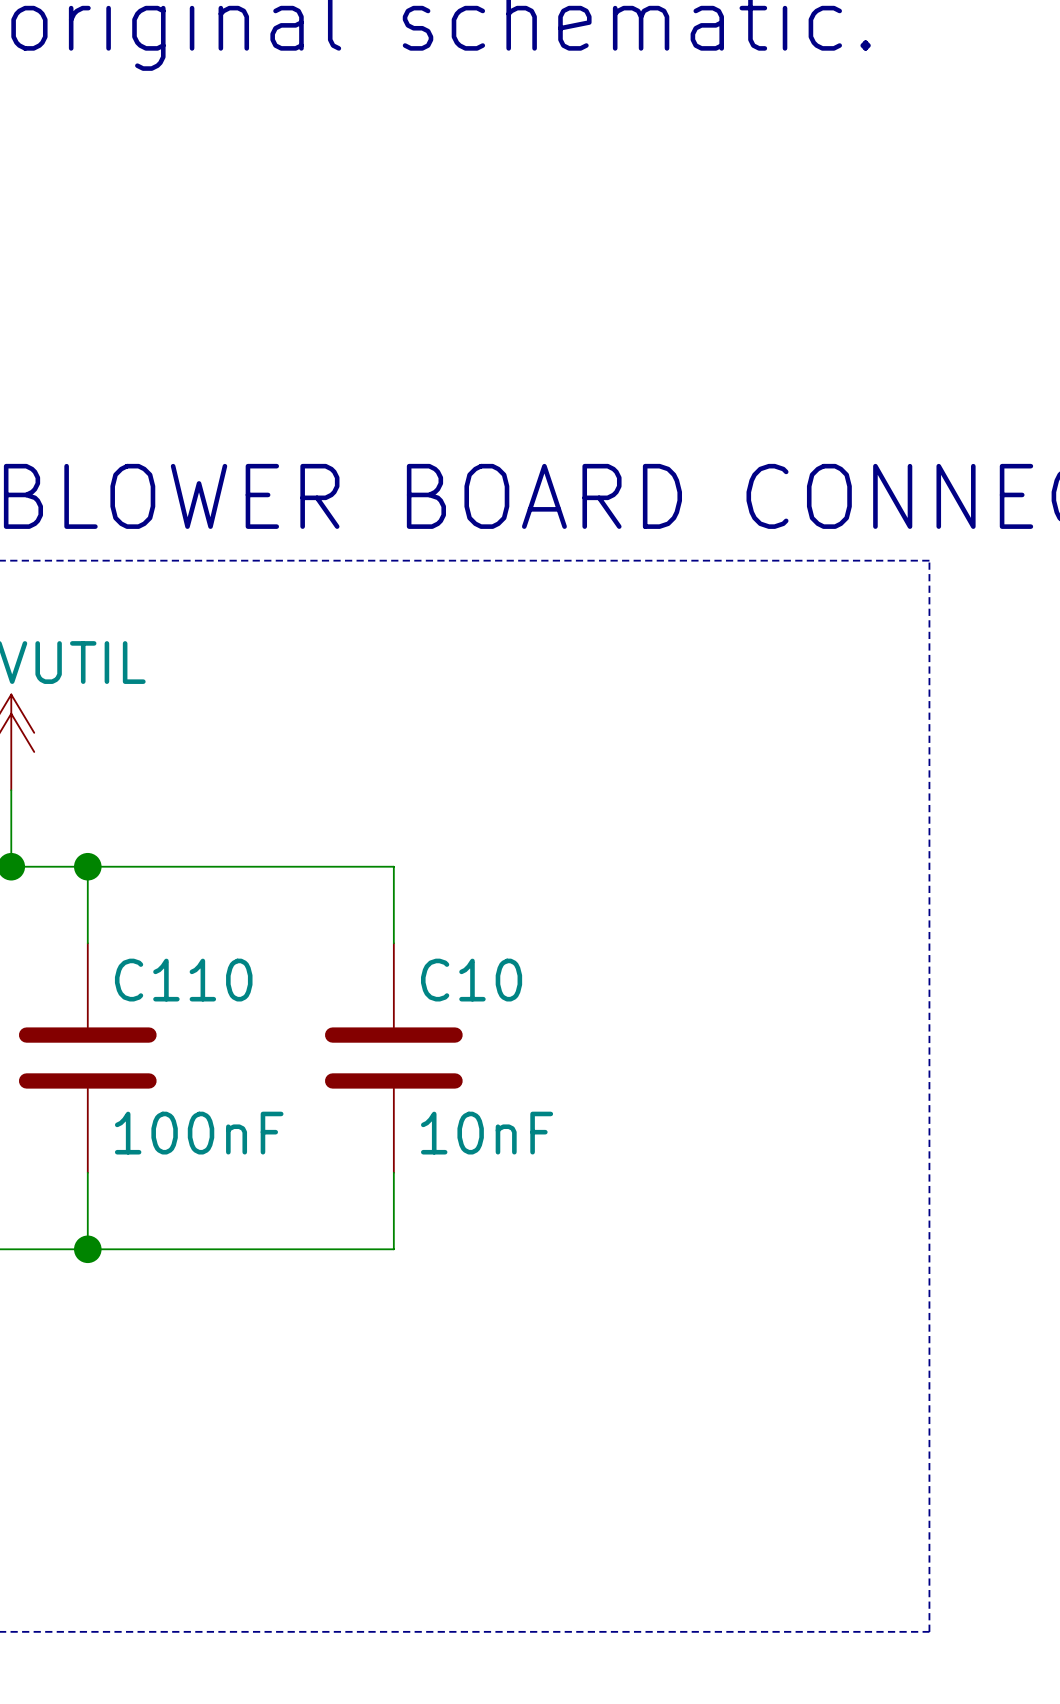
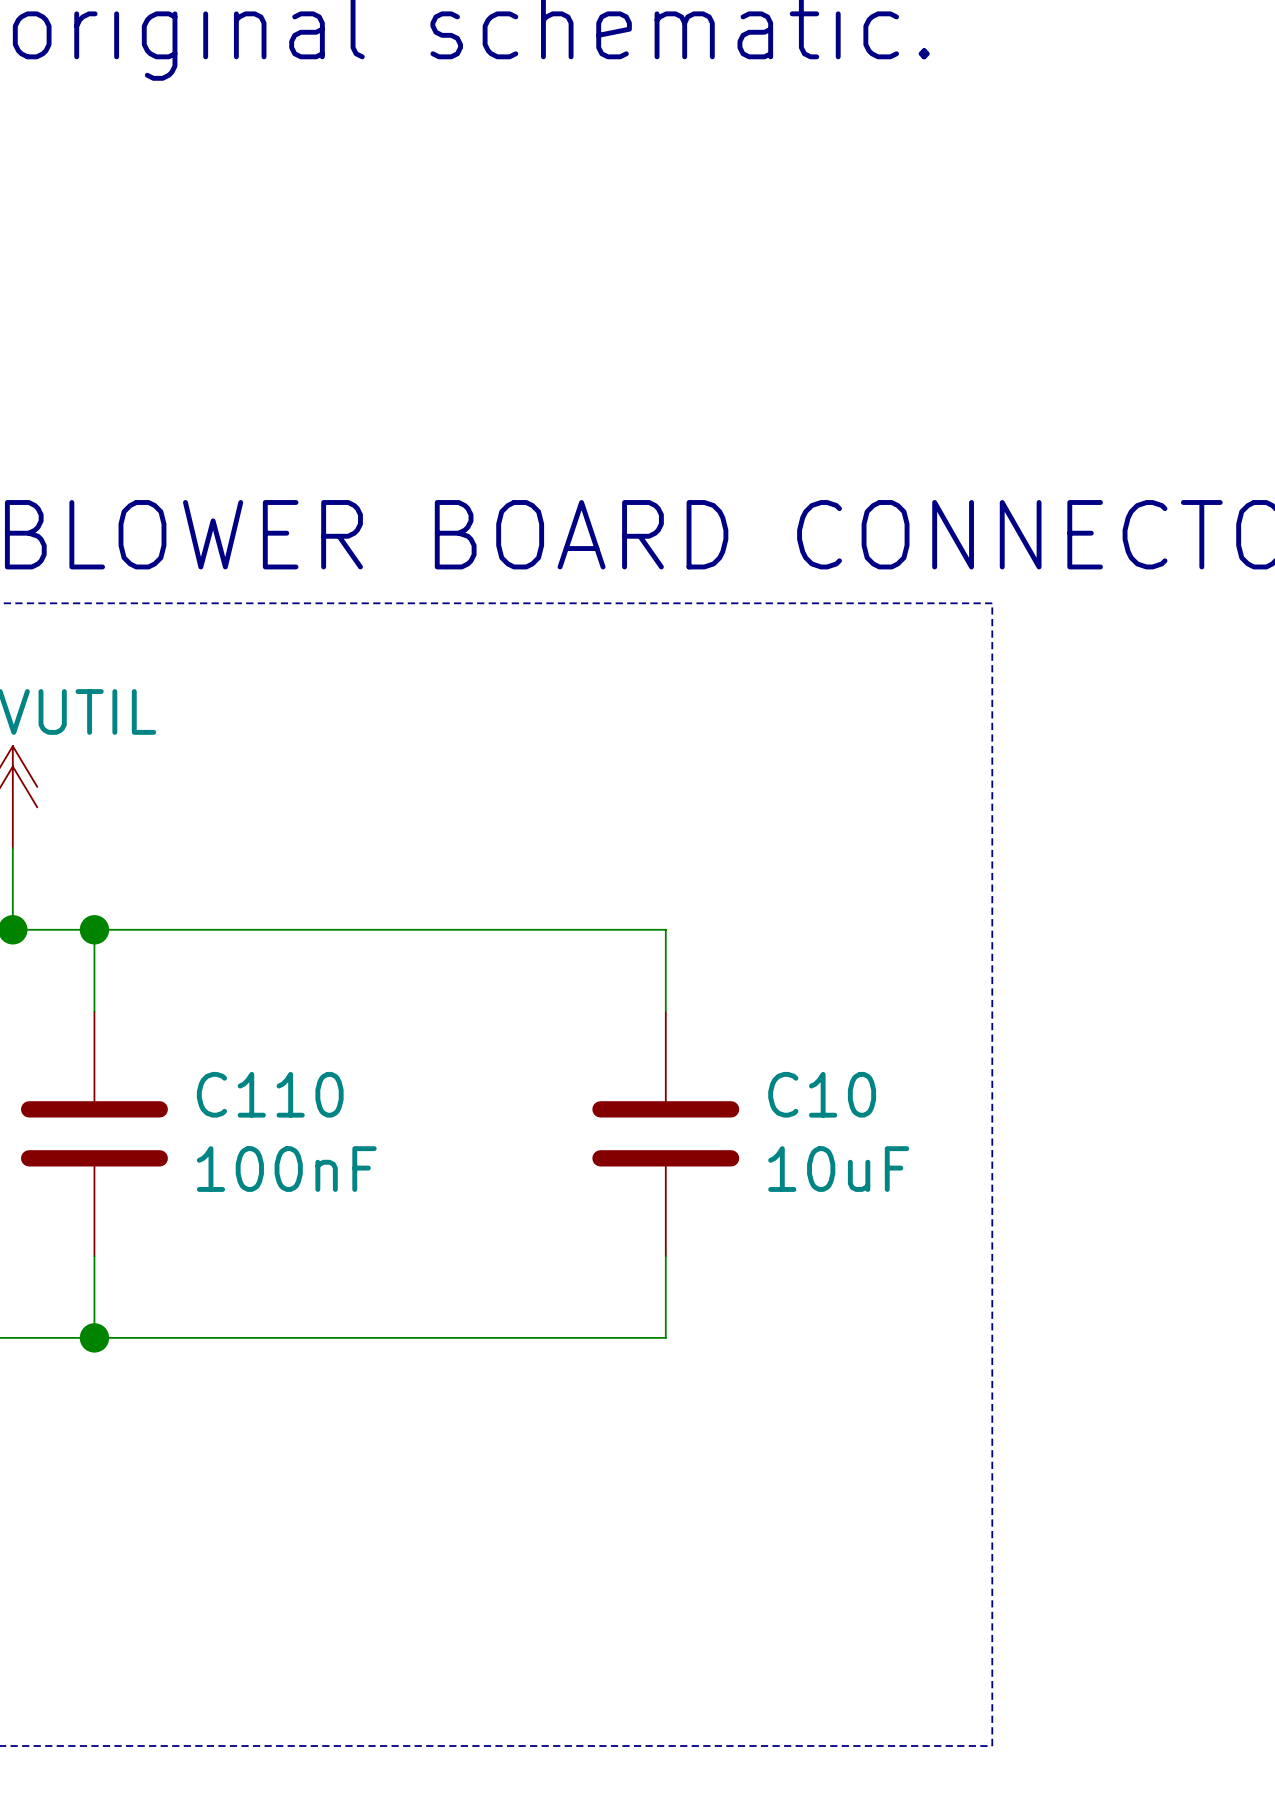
wire: (393, 866) (393, 943) -> (420, 929) (665, 929) (665, 1011)
C110 name position: C110 (183, 980) -> C110 (270, 1094)
C10 name position: C10 (471, 980) -> C10 (822, 1094)
C10 position: (393, 1058) -> (665, 1133)
C110 value position: 100nF (199, 1133) -> 100nF (286, 1169)
C10 value: 10nF (487, 1133) -> 10uF (838, 1169)
wire: (393, 1172) (393, 1249) -> (665, 1256) (665, 1337) (420, 1337)

